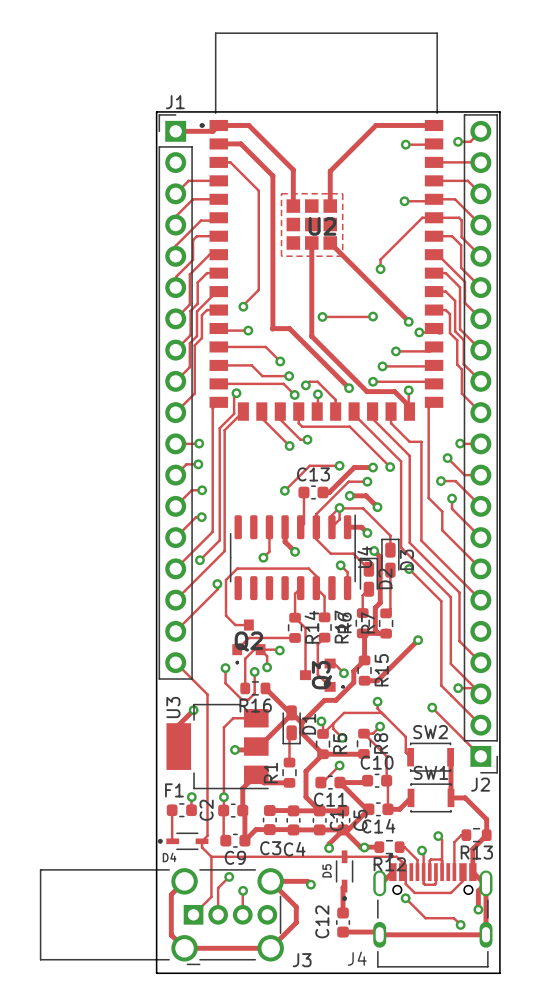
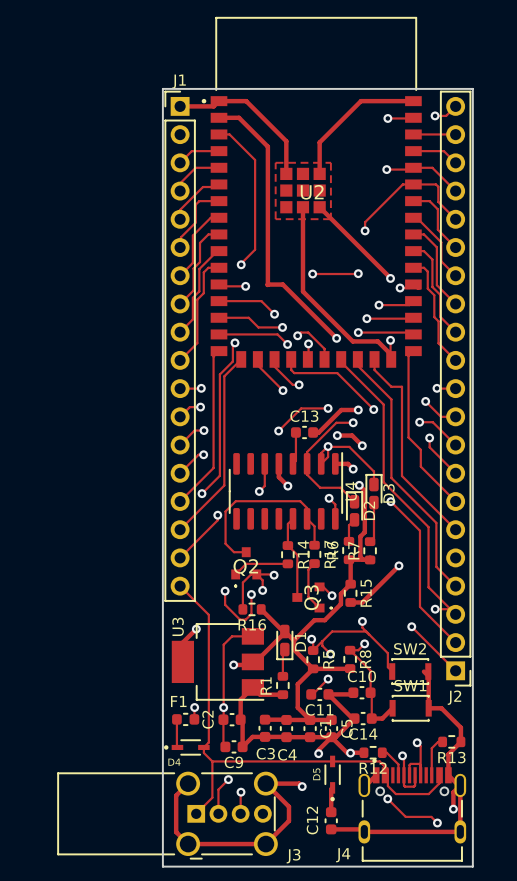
track: none -> (423, 671) (428, 676)

